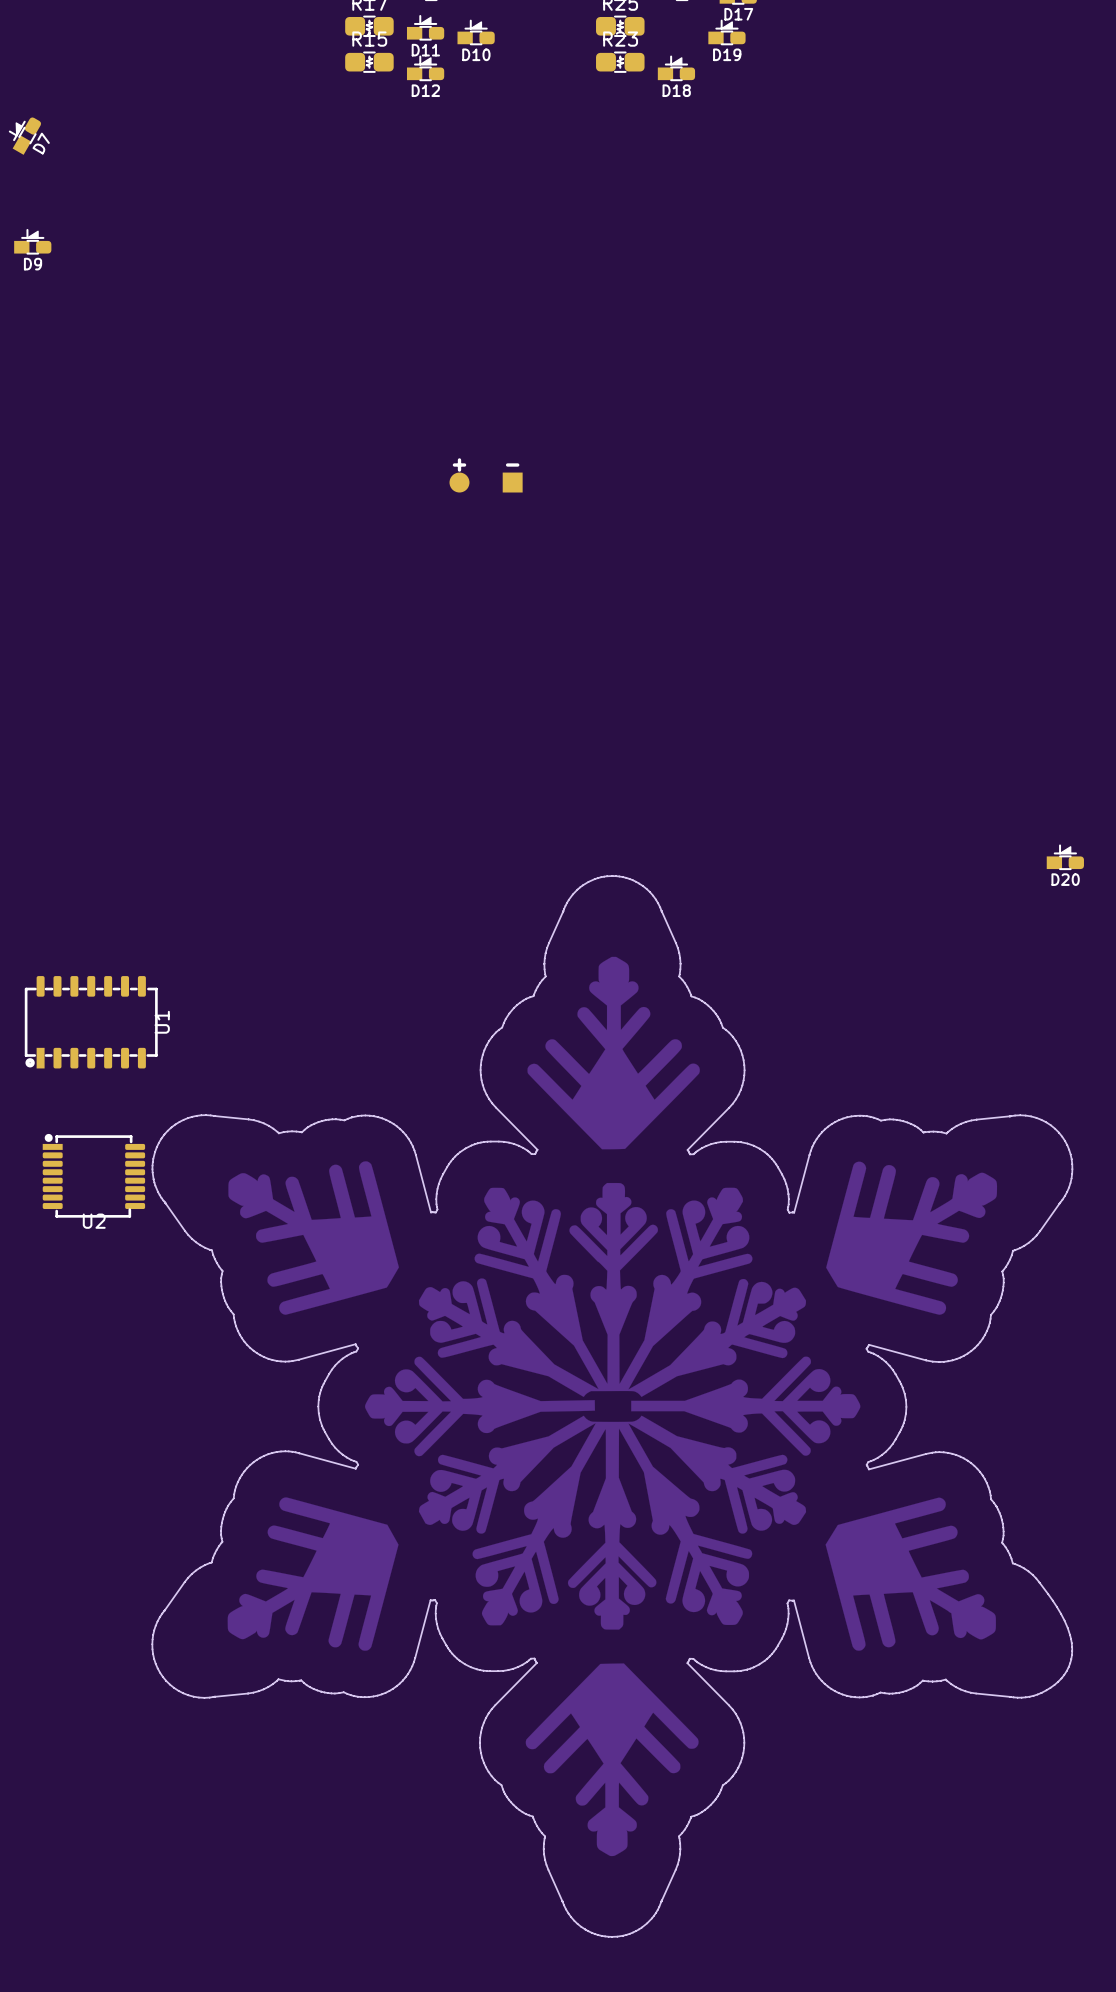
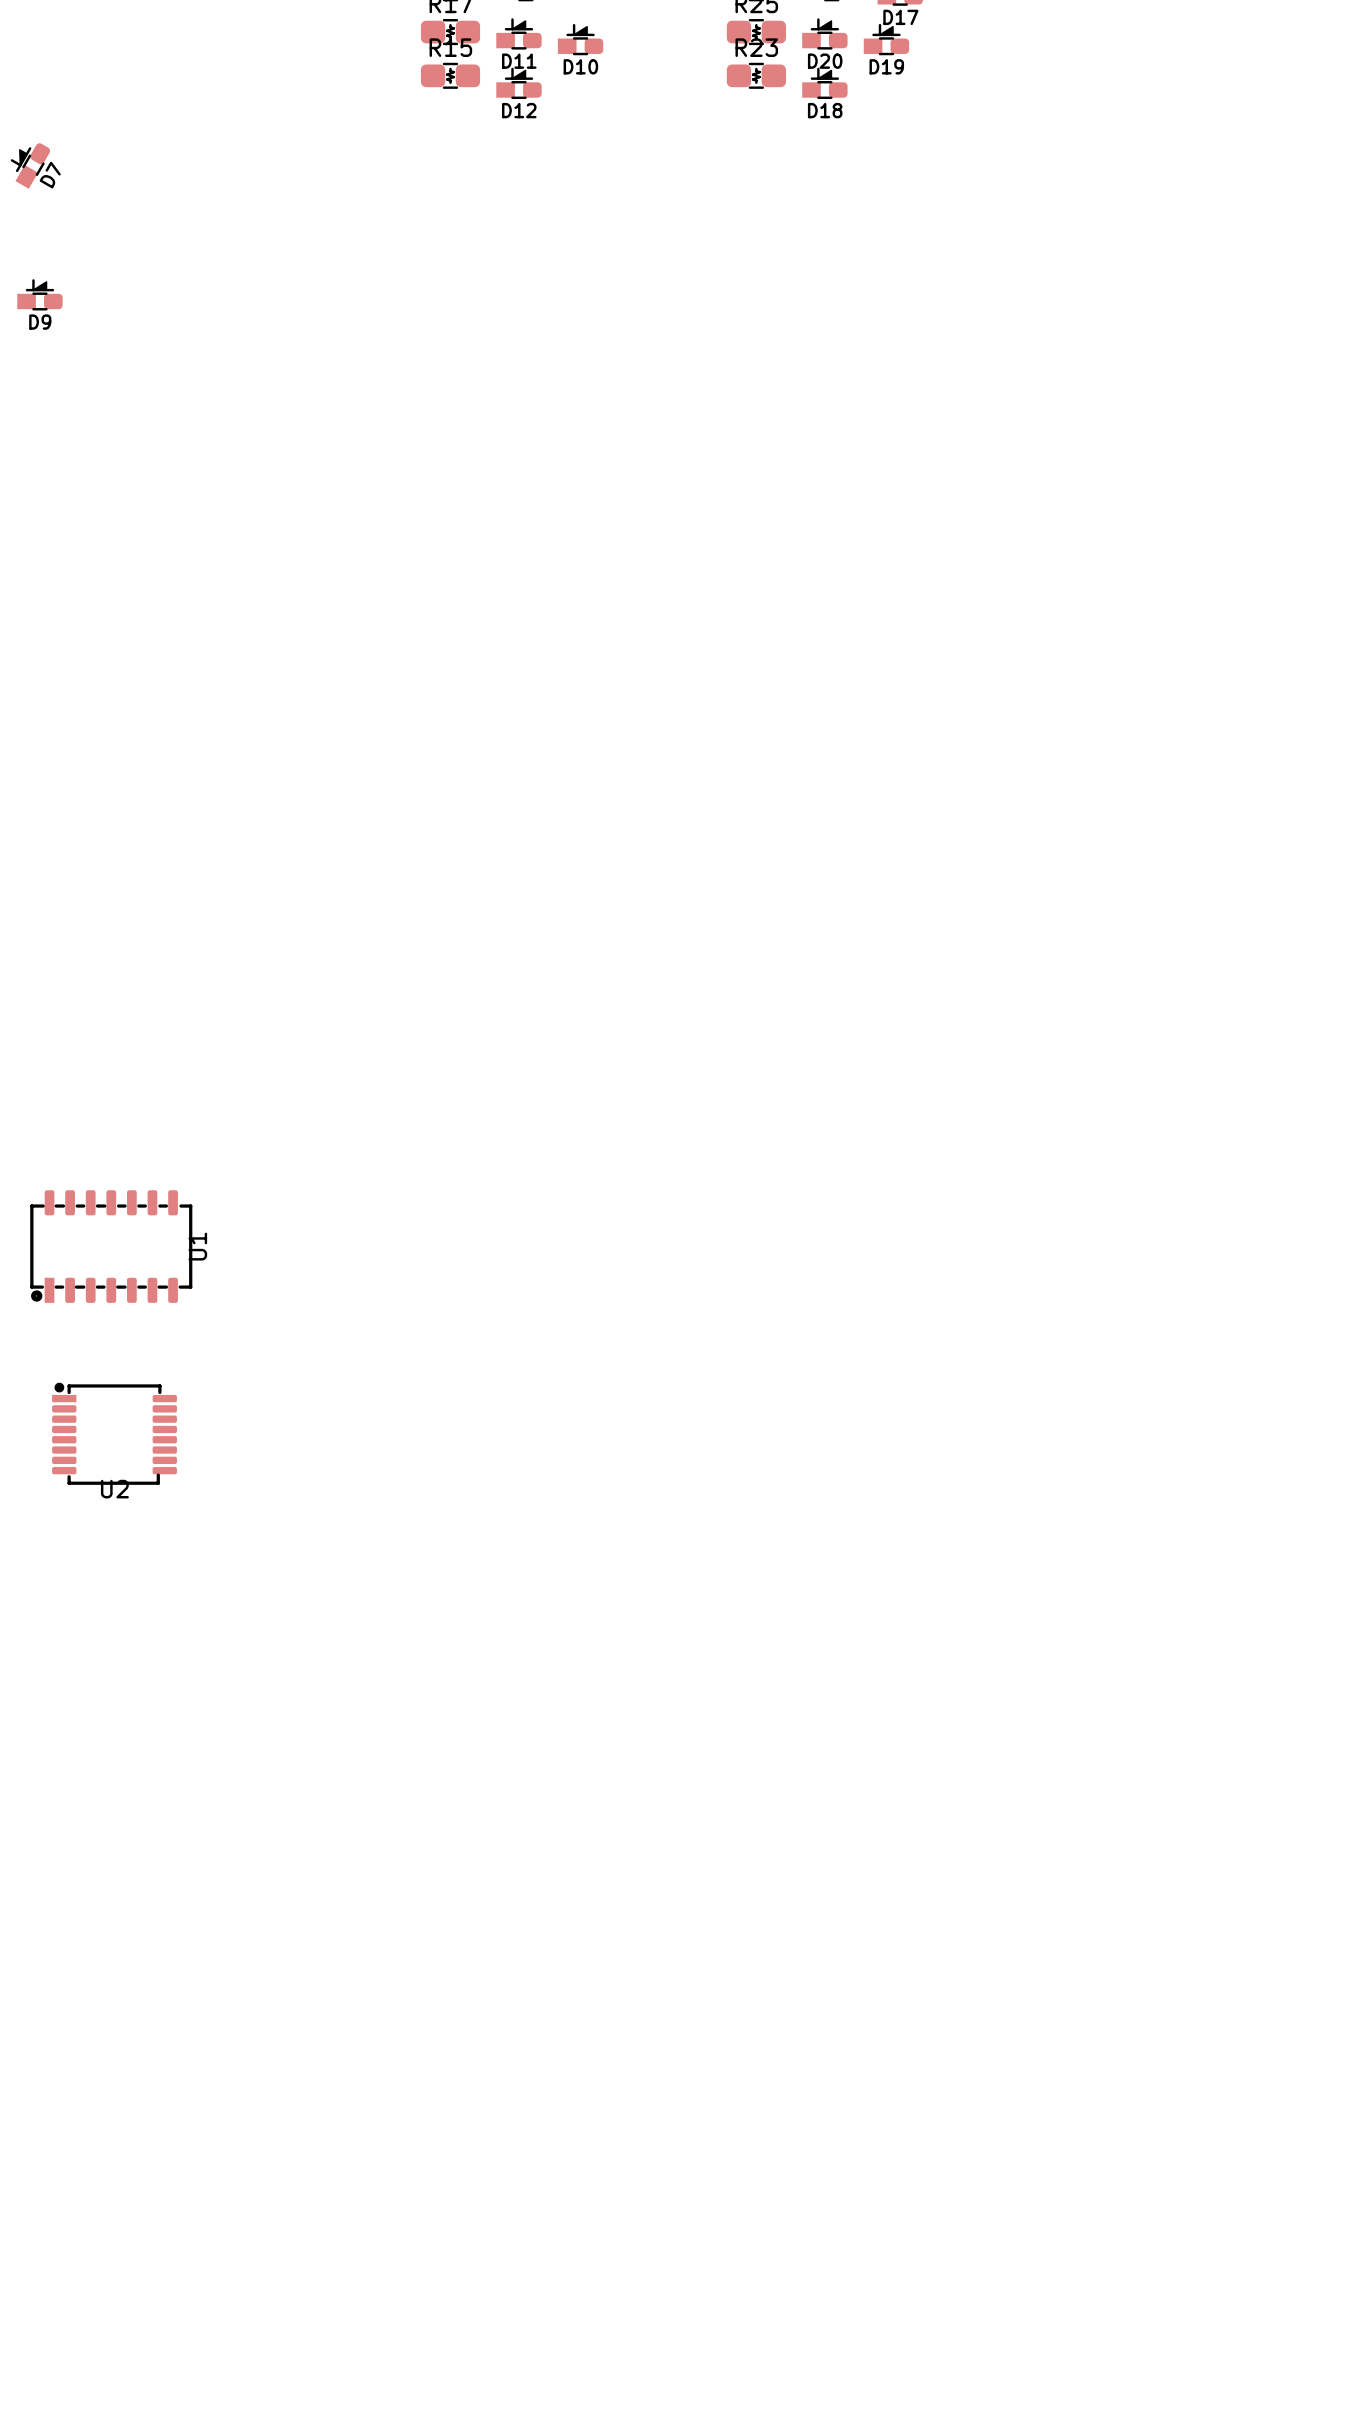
part: (486, 482) -> none
D20 position: (1065, 857) -> (824, 33)
drawing: [151, 875, 1074, 1938] -> none

